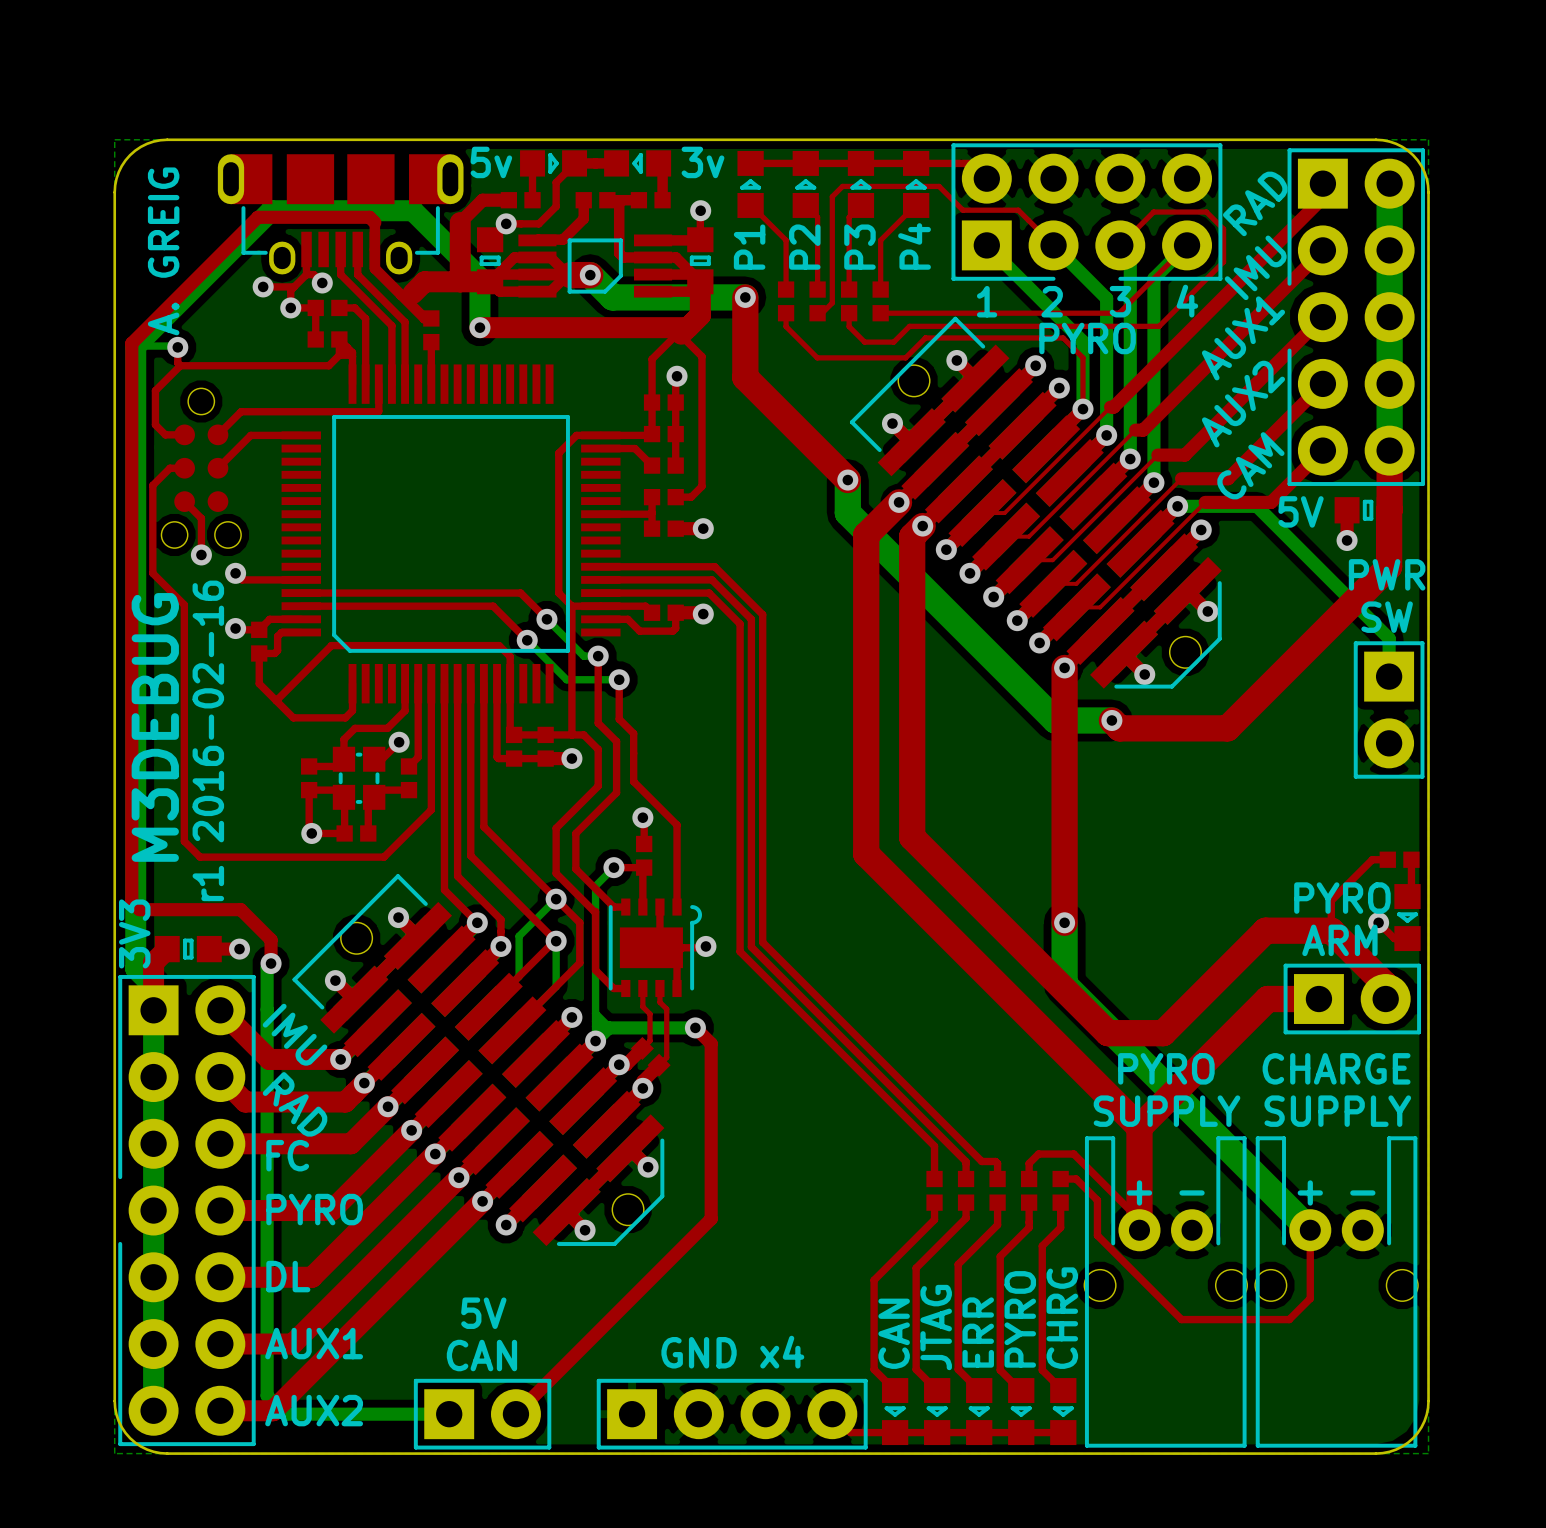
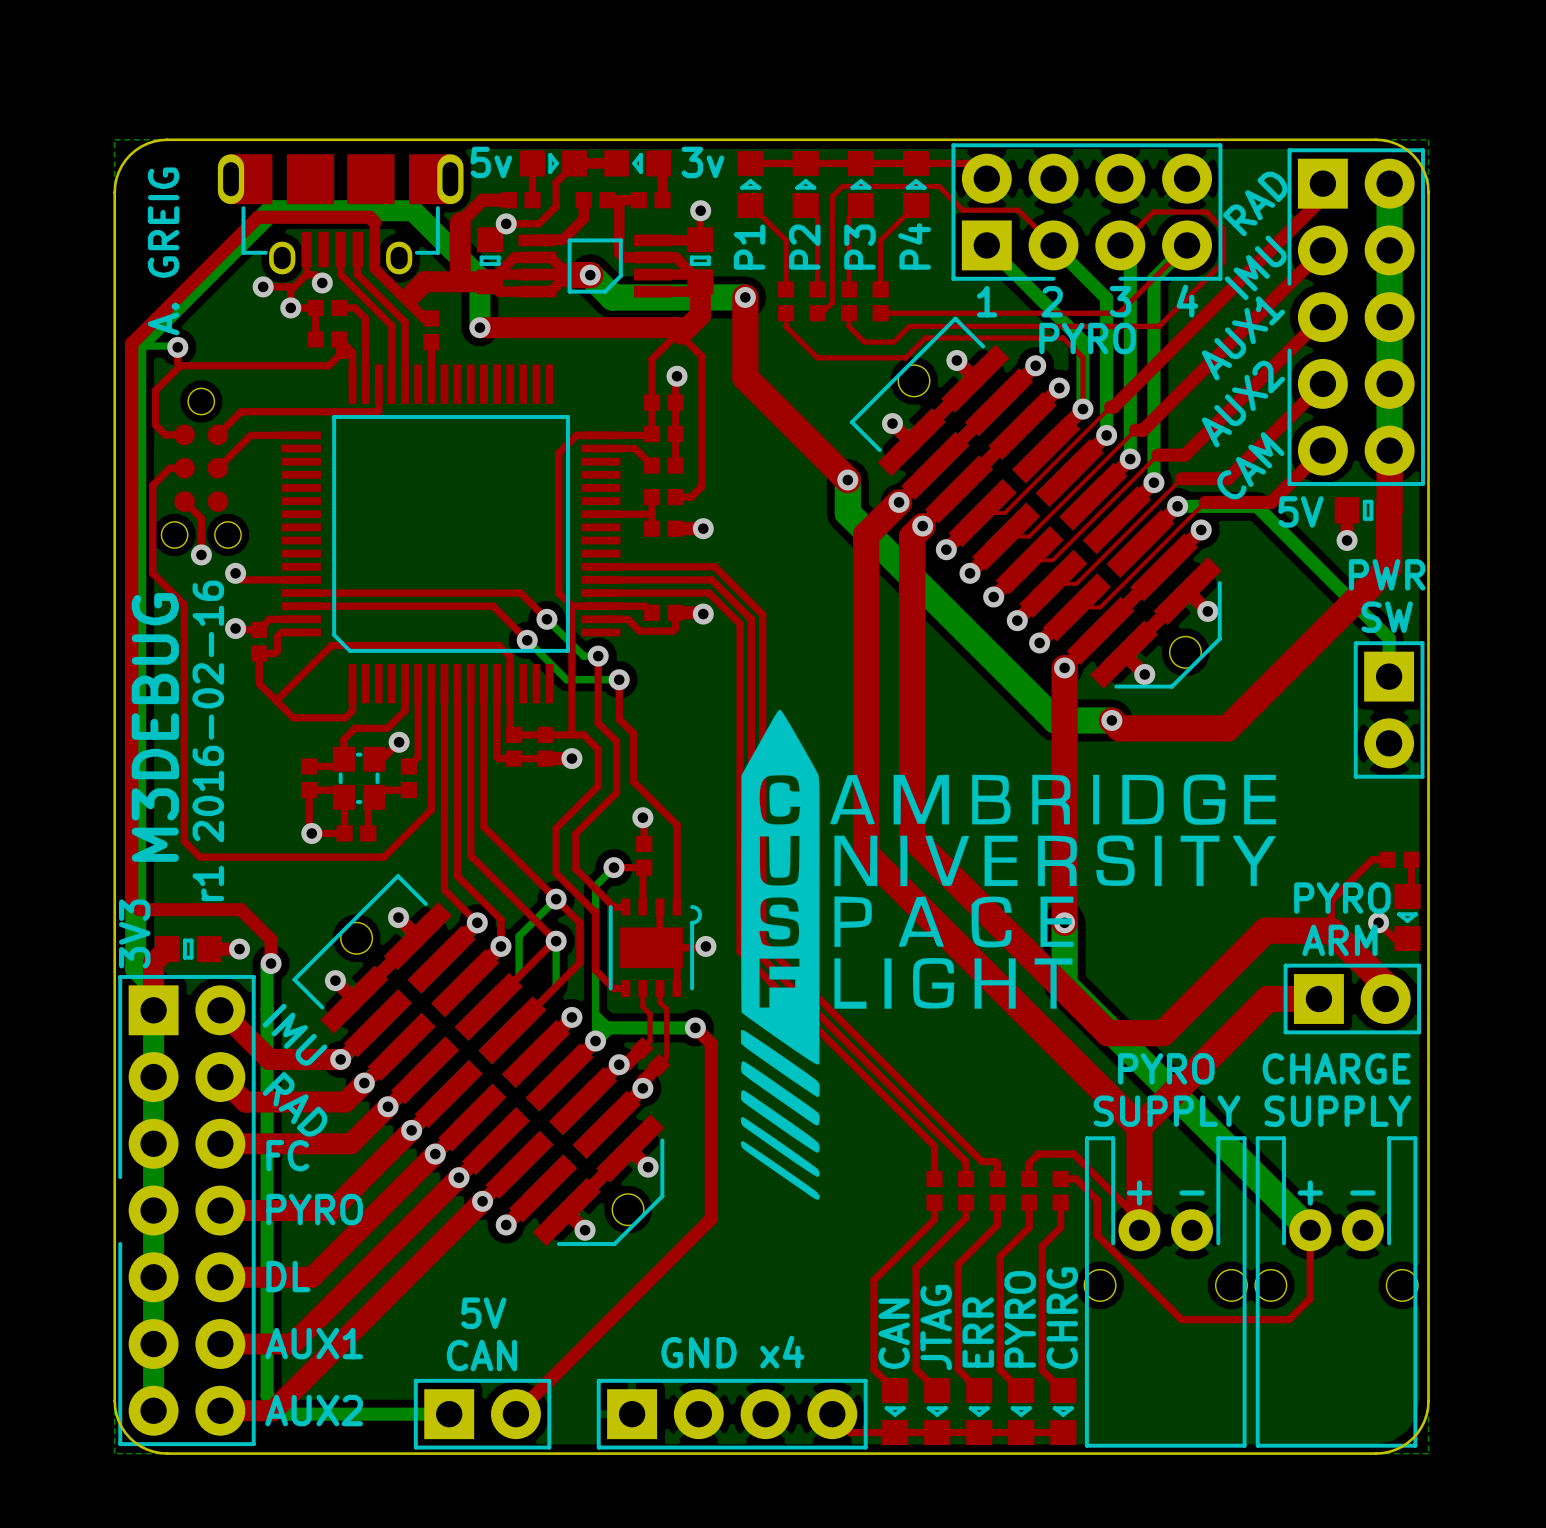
drawing: none -> [740, 709, 1277, 1200]

